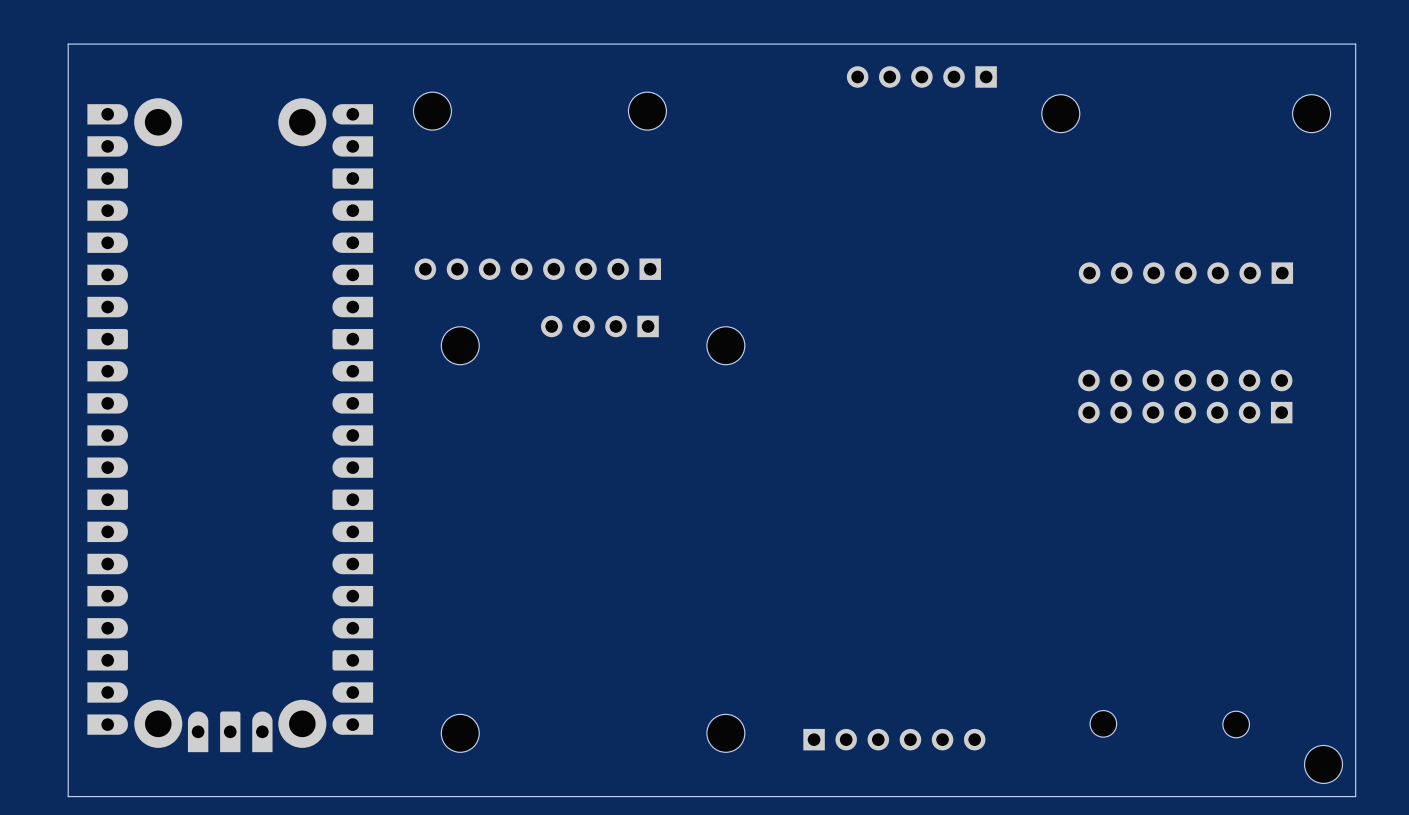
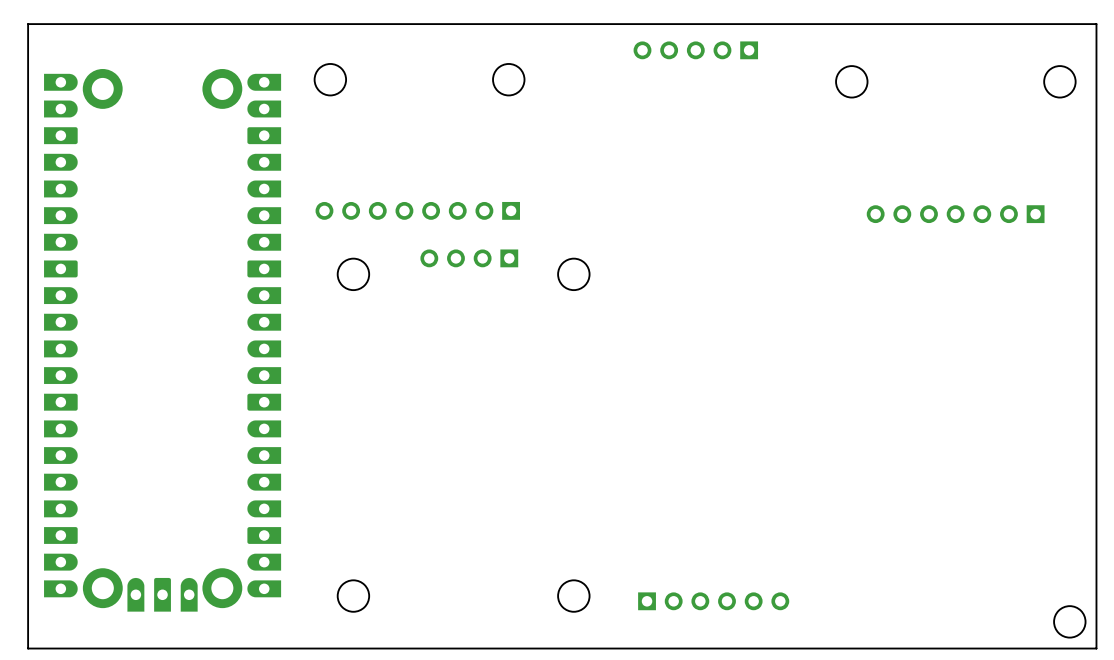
part position: (921, 76) -> (695, 50)
part: (1185, 396) -> none
part: (1103, 723) -> none
part: (1236, 724) -> none

